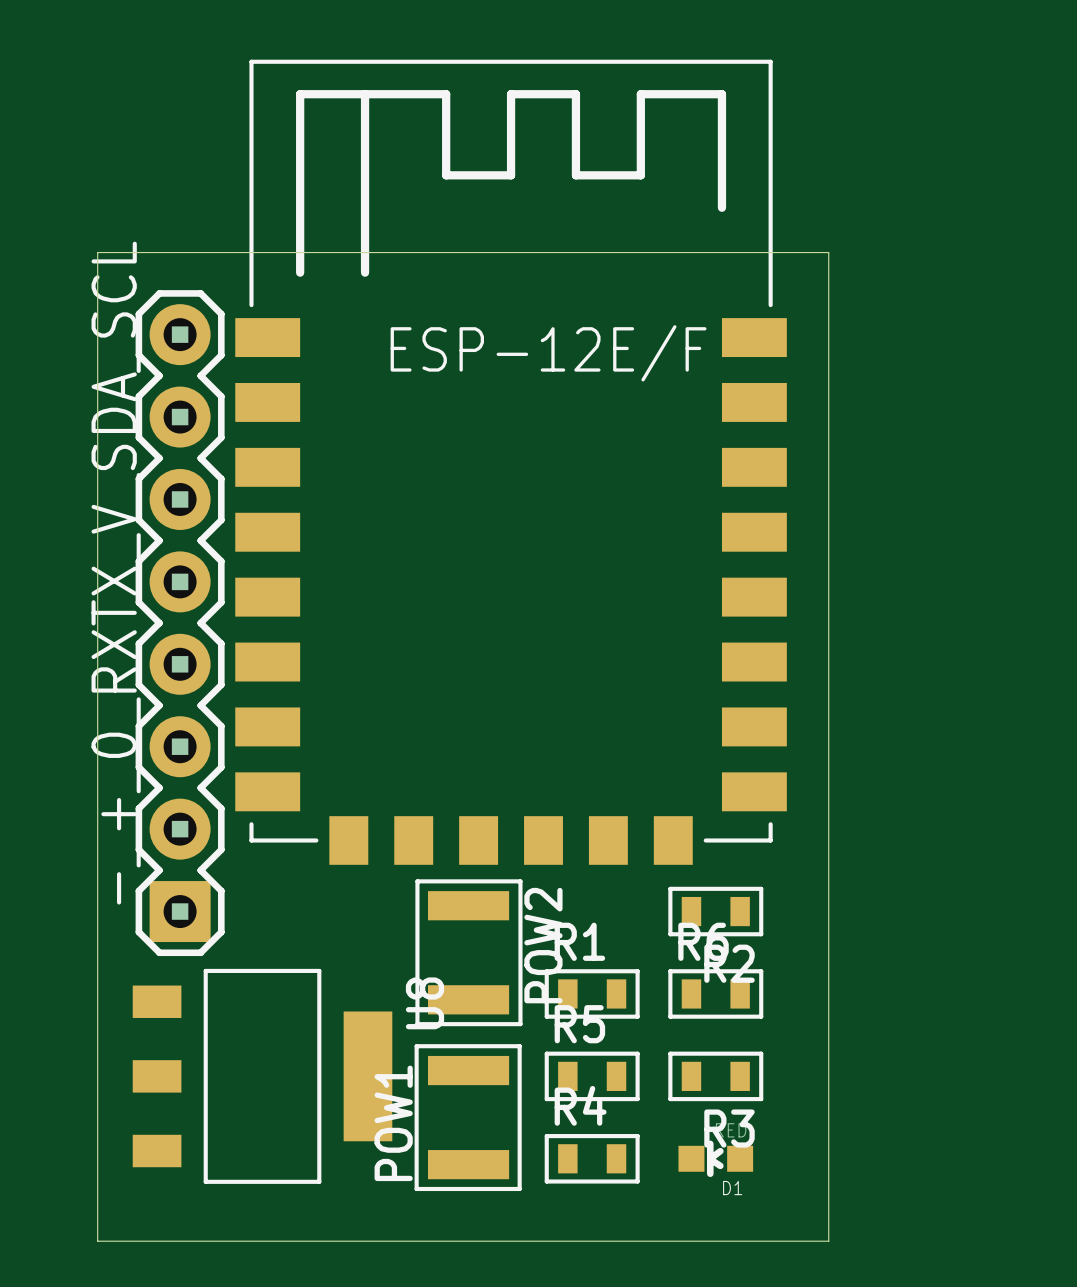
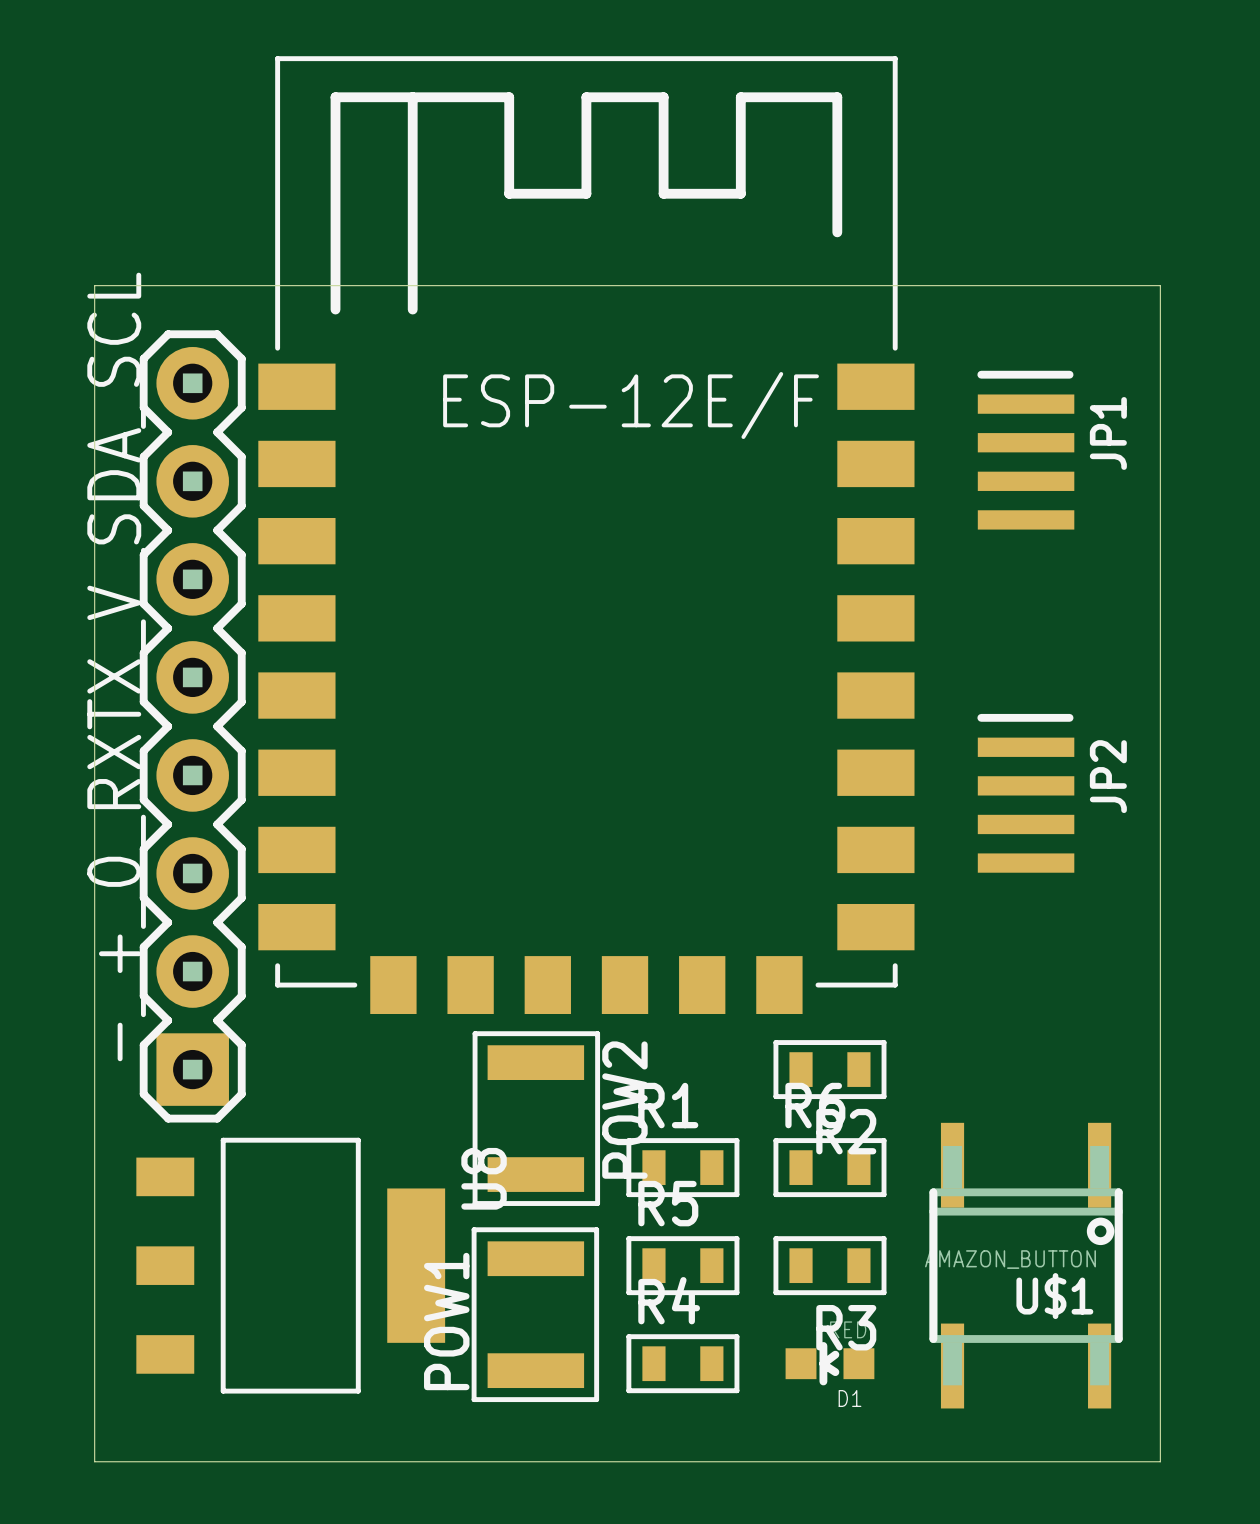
board edge: (828, 252) (828, 1241) -> (964, 285) (1160, 285) (1160, 1461) (964, 1461)
JP1: none -> (1025, 450)
JP2: none -> (1025, 793)
U$1: none -> AMAZON_BUTTON (1026, 1265)

